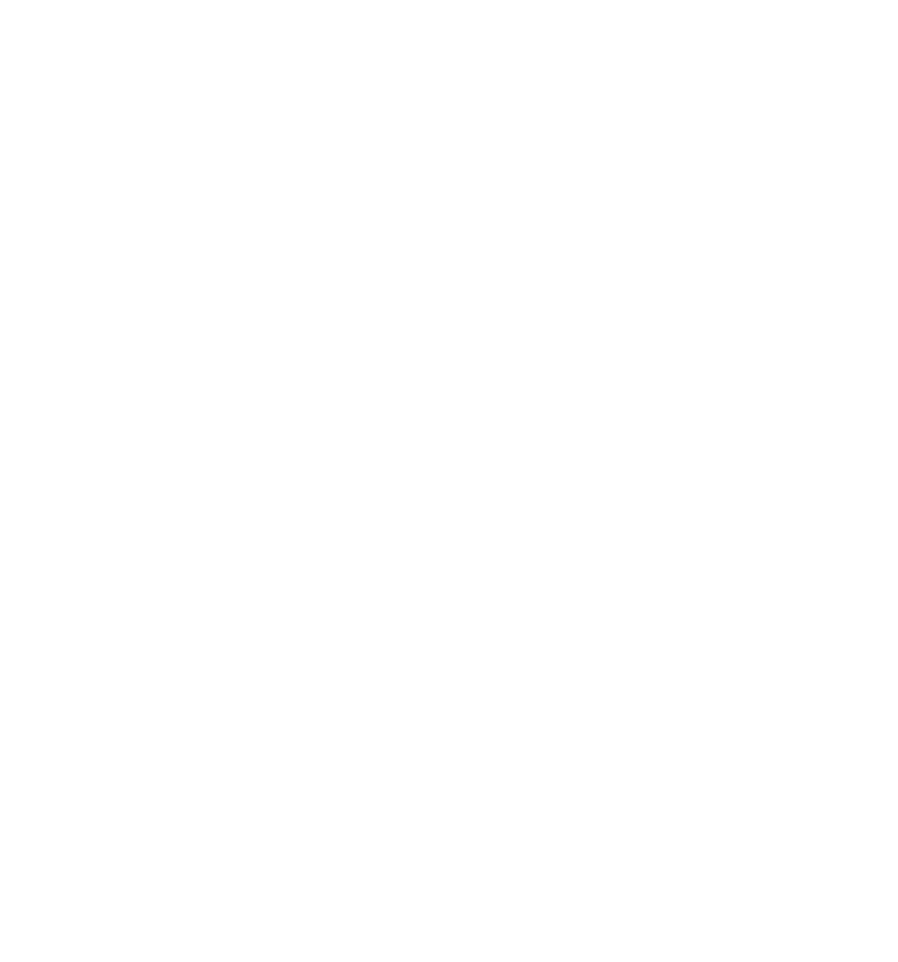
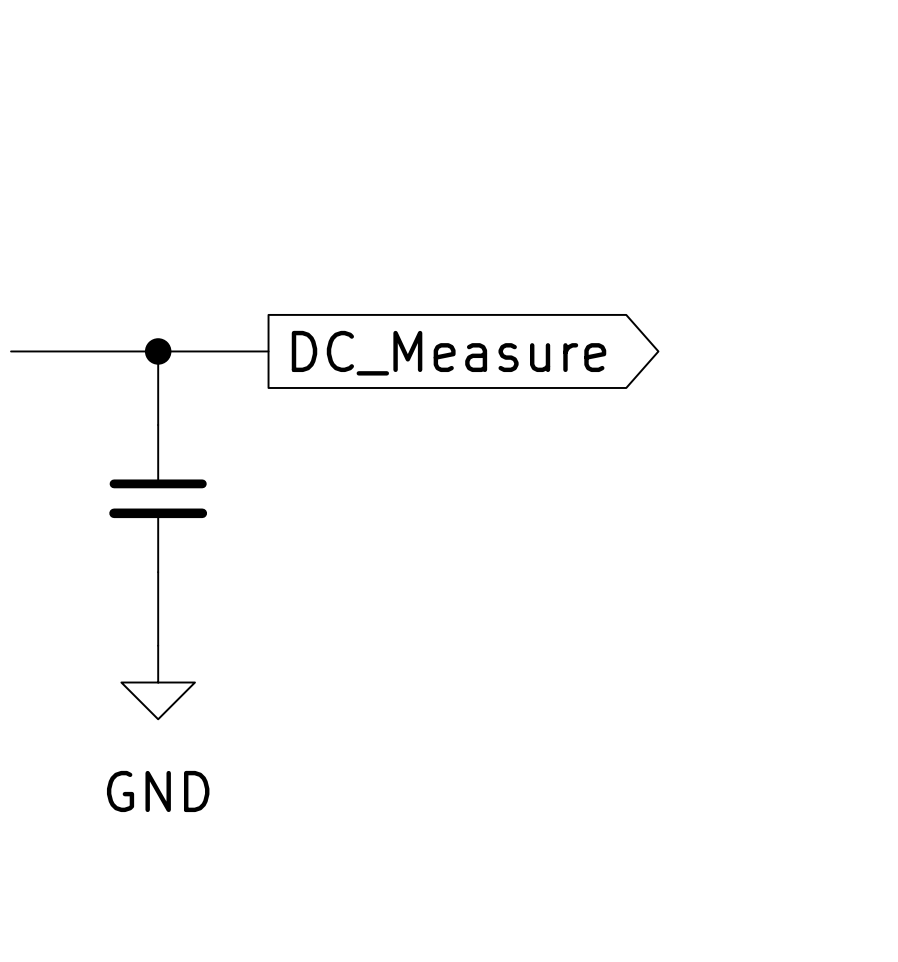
wire: none -> (11, 351) (268, 351)
wire: none -> (158, 351) (158, 425)
junction: none -> (158, 351)
global label: none -> DC_Measure (449, 353)
part: none -> (158, 498)
wire: none -> (158, 572) (158, 645)
power symbol: none -> GND (158, 682)

